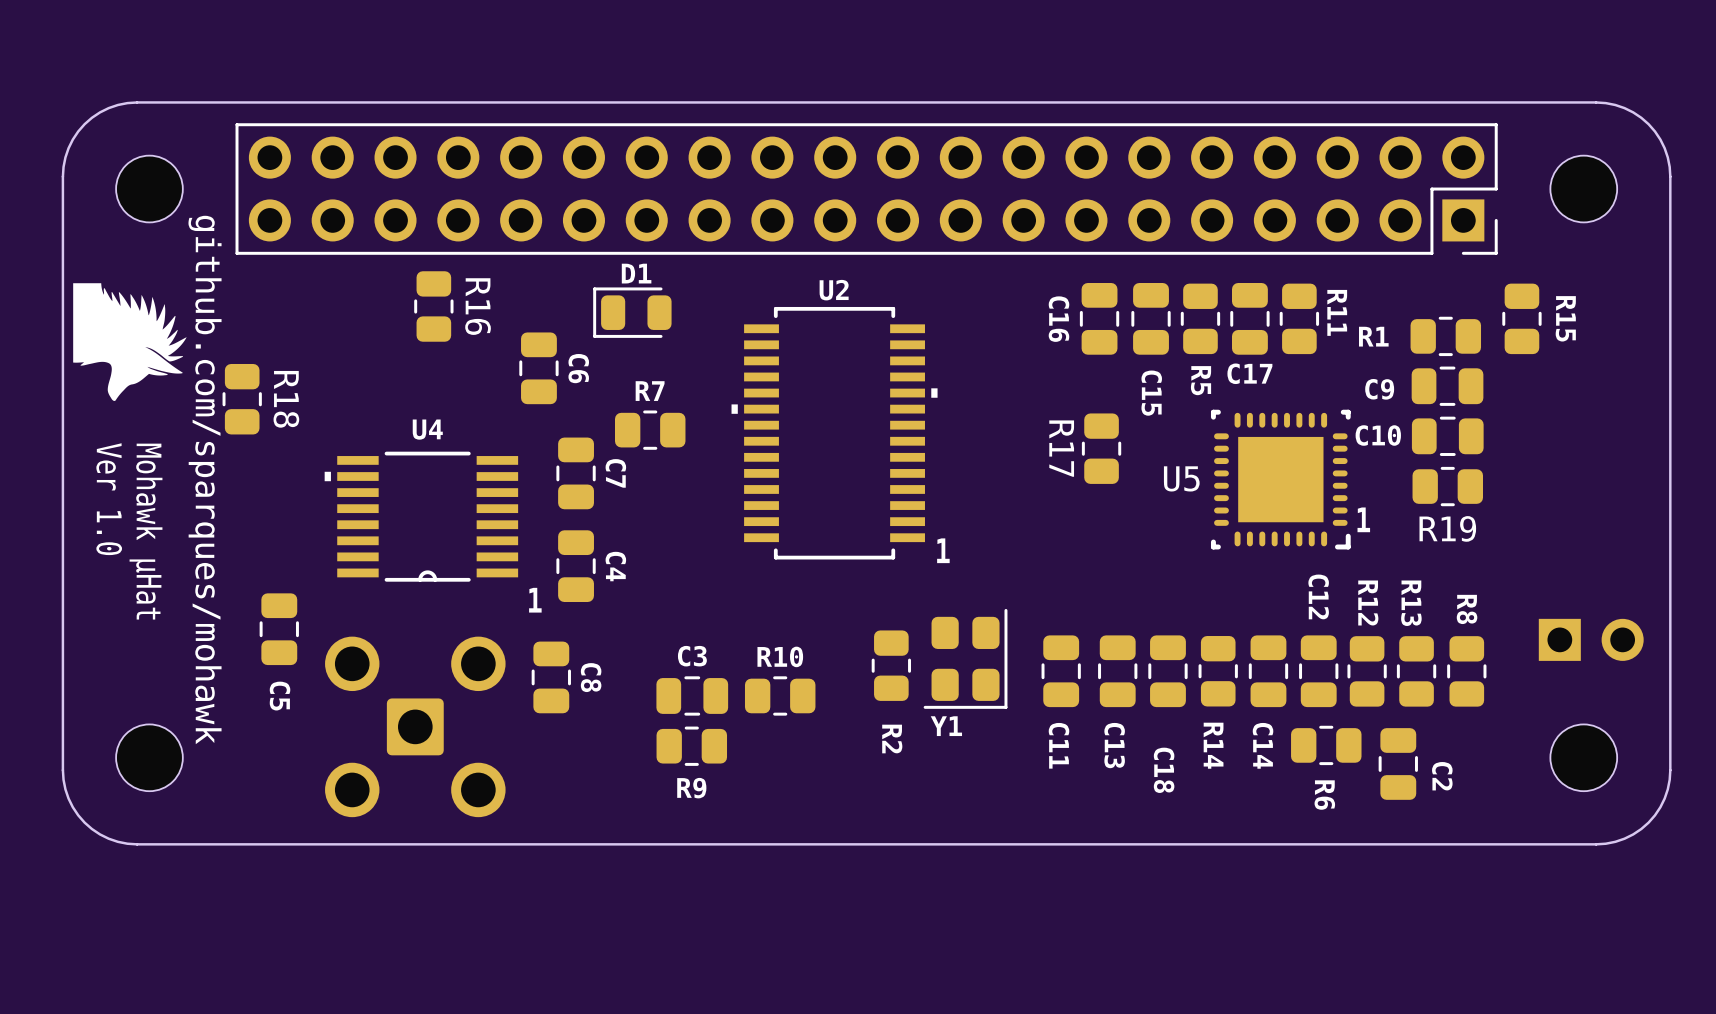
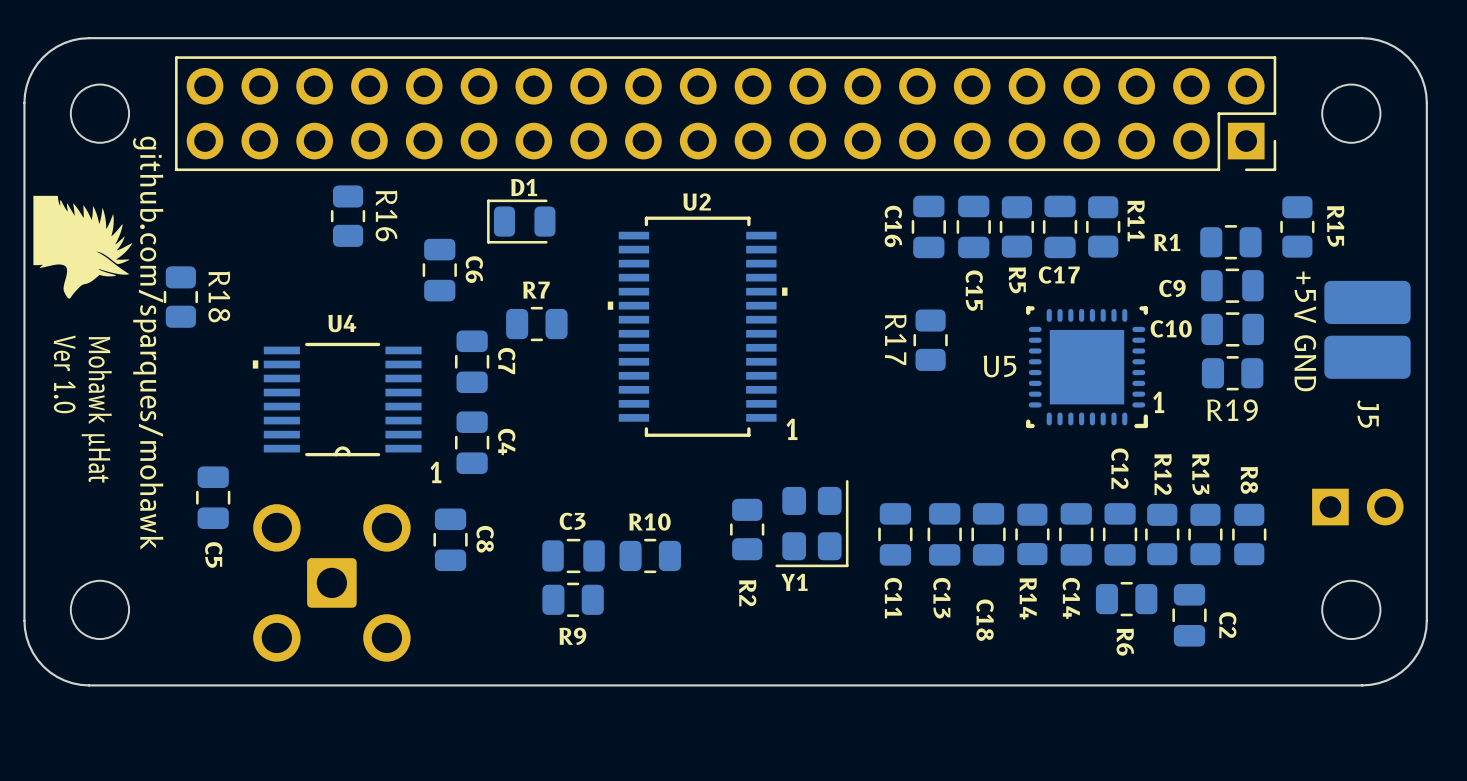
J5: none -> (1367, 329)
text: none -> +5V GND (1305, 331)

